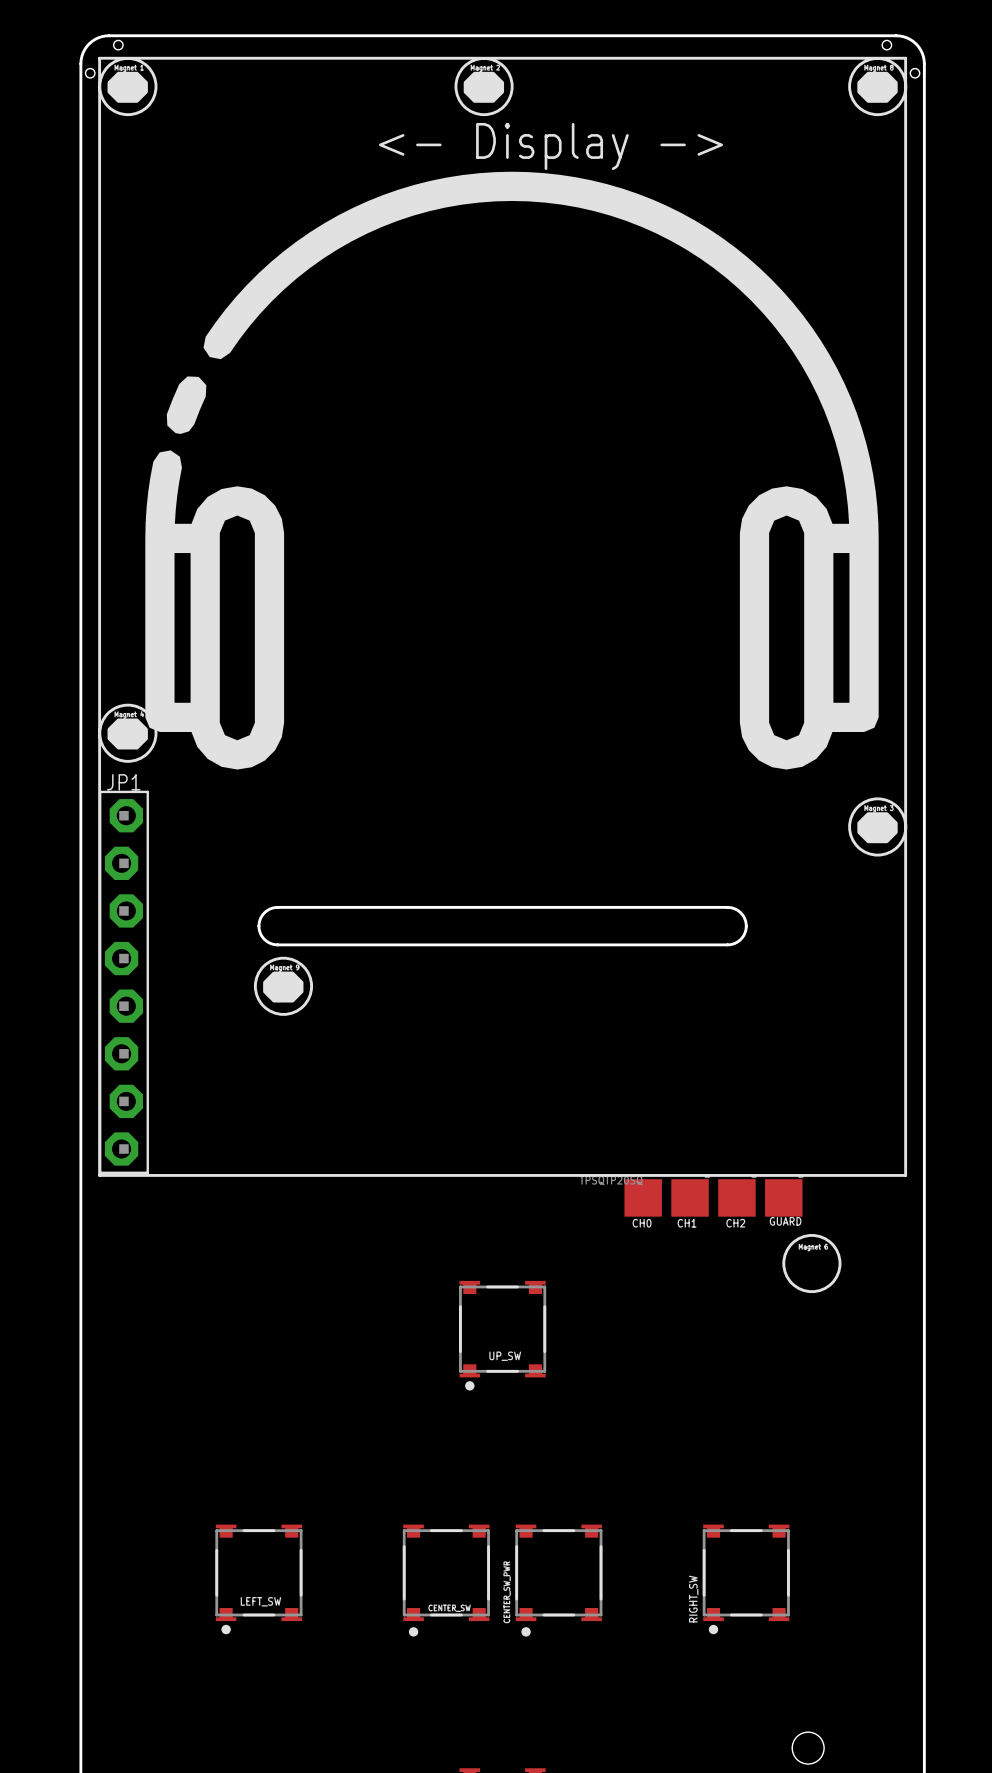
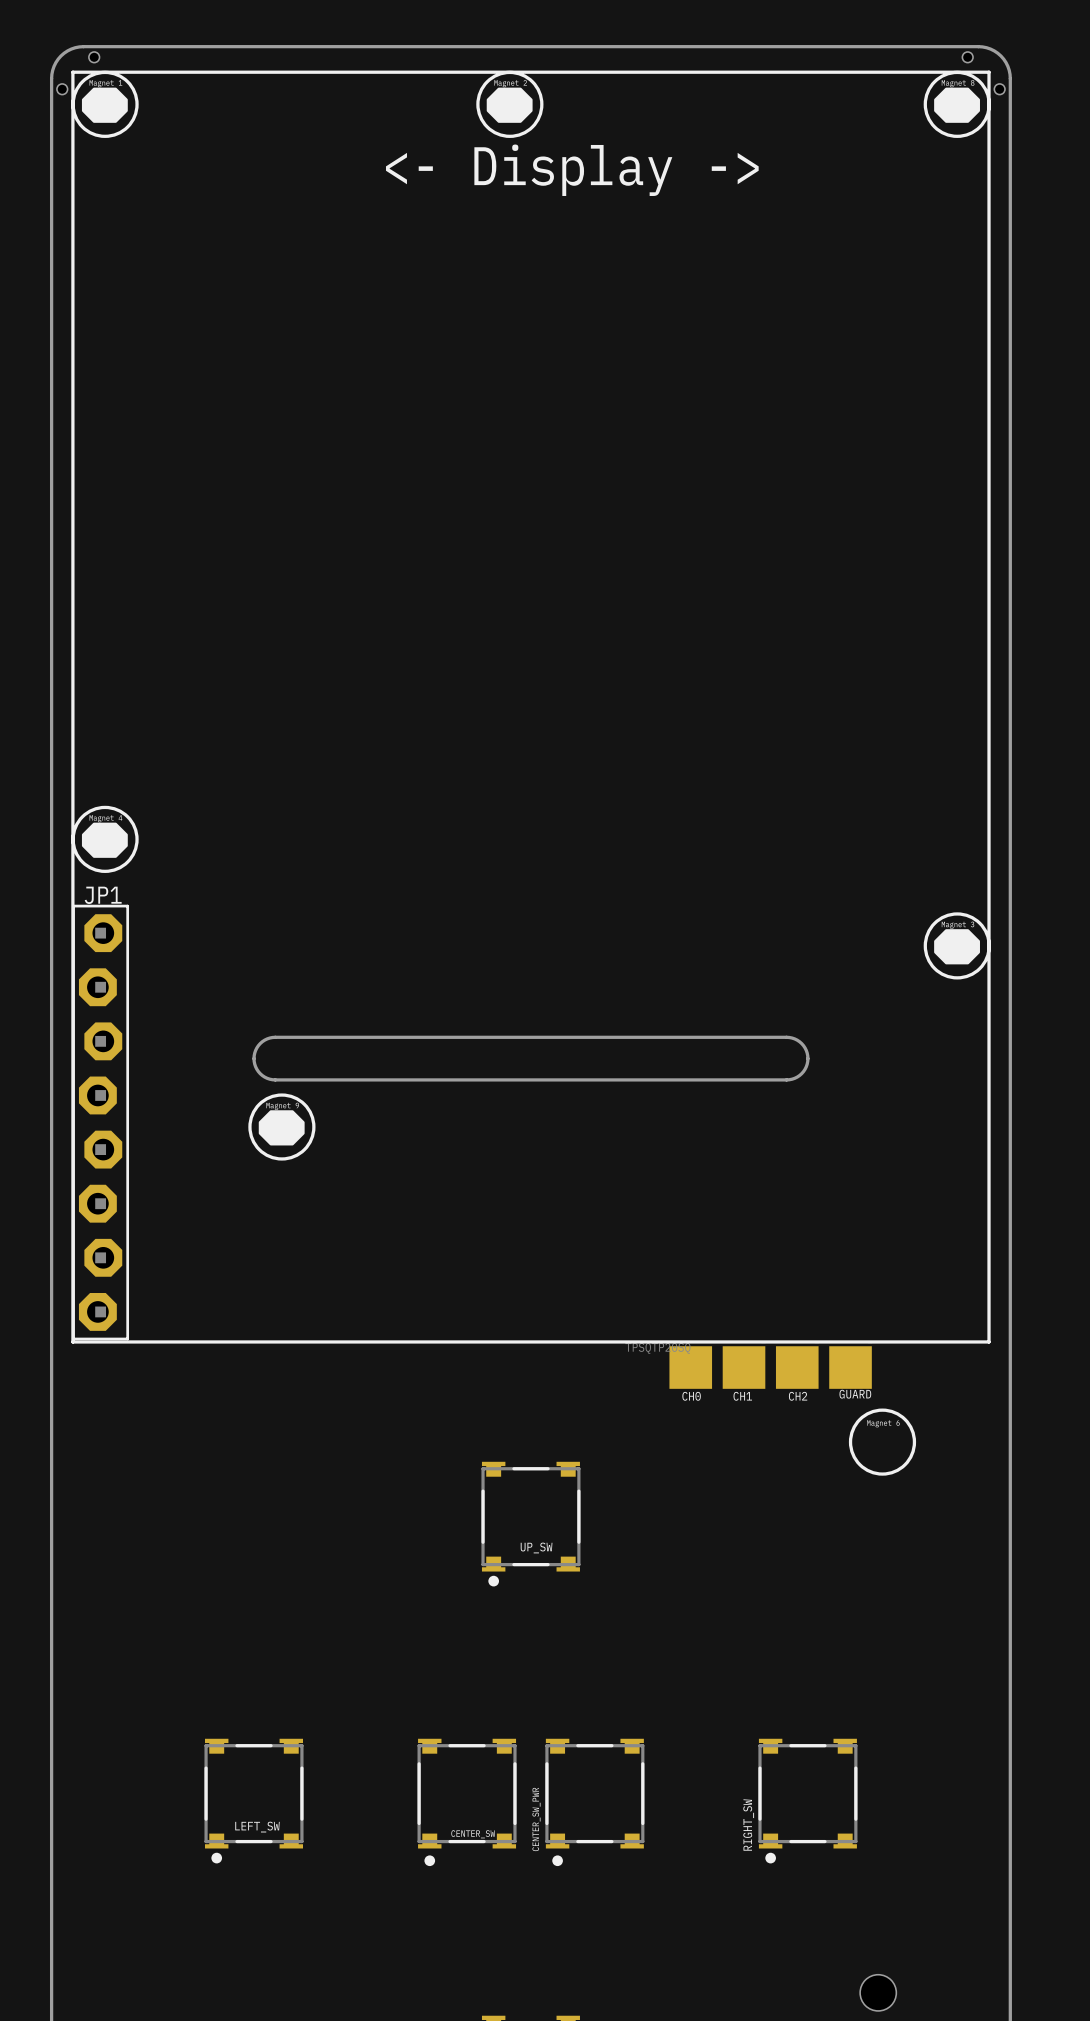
drawing: [145, 171, 879, 770] -> none

